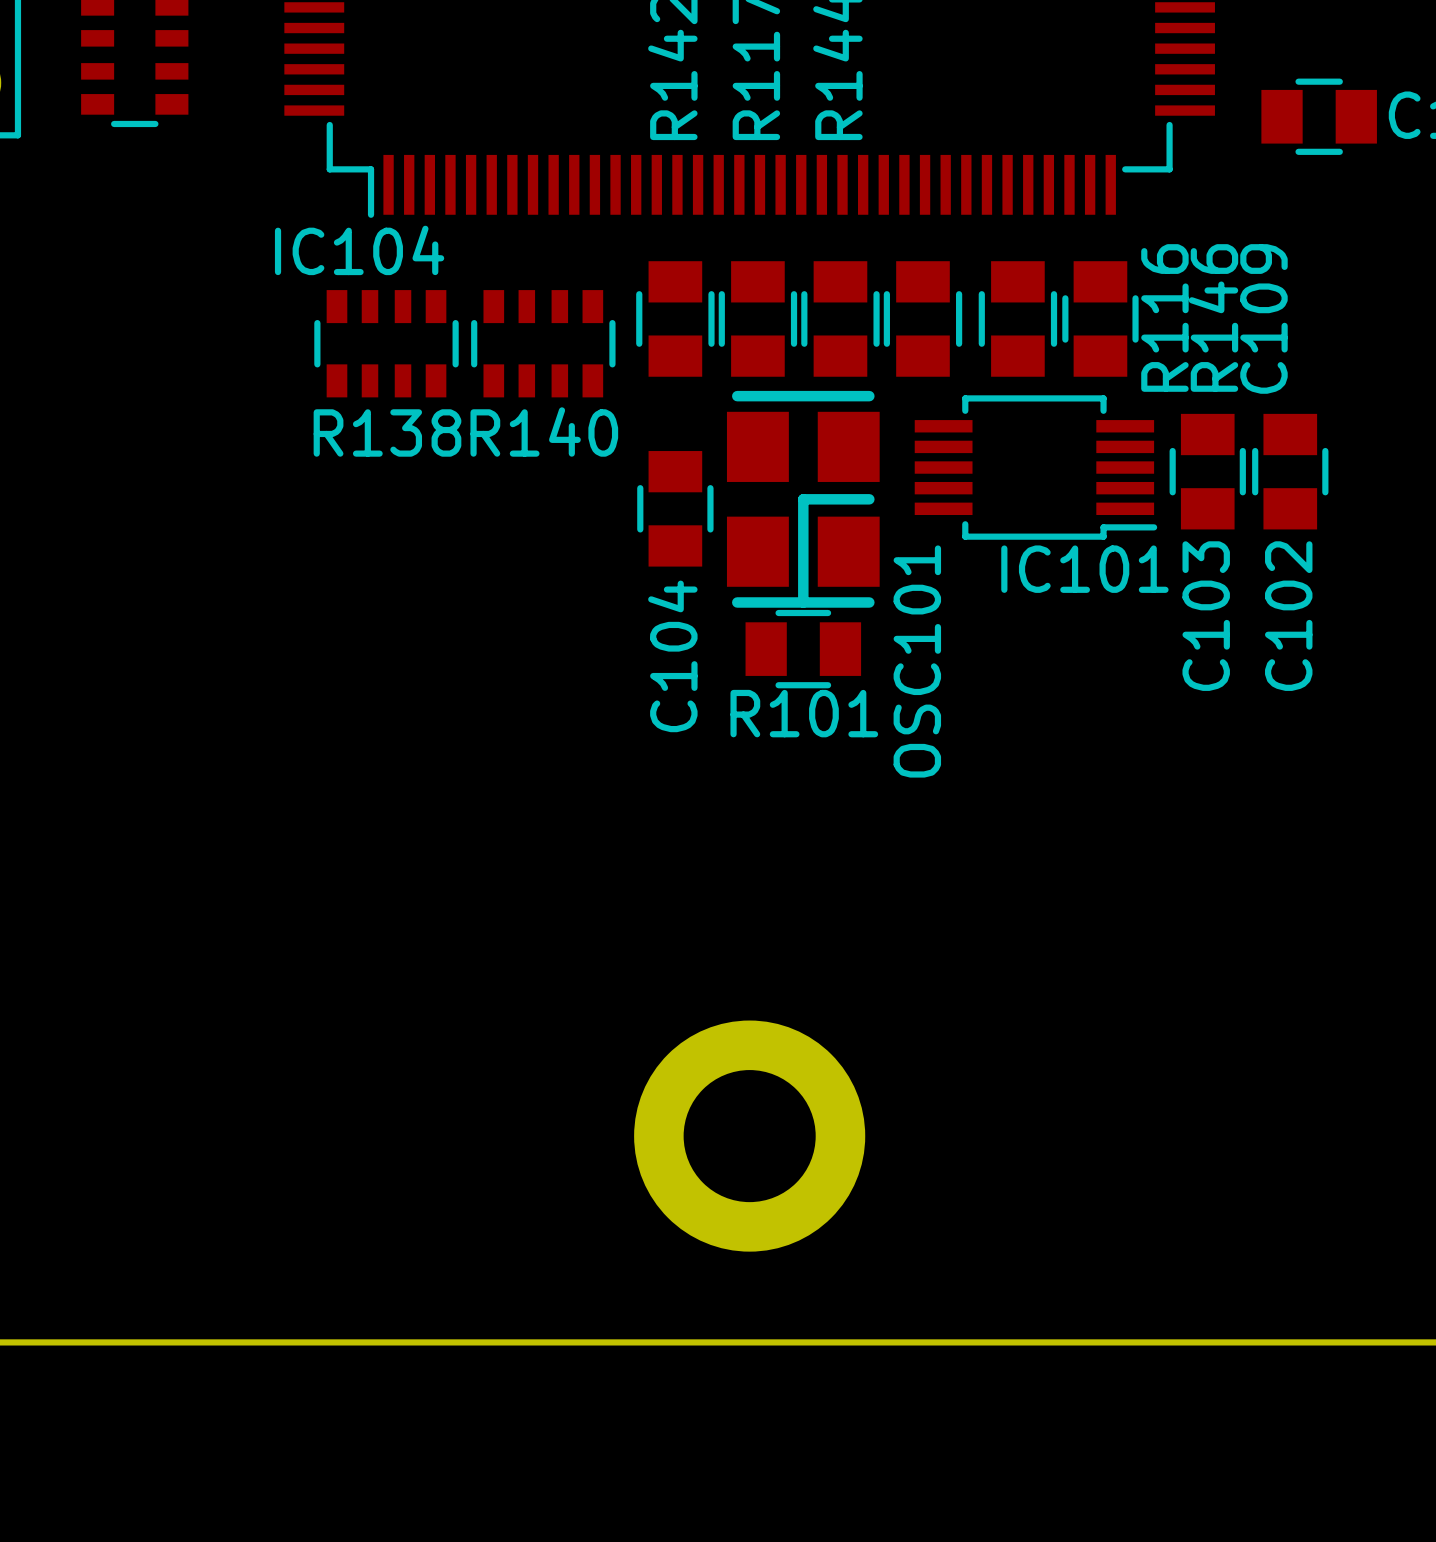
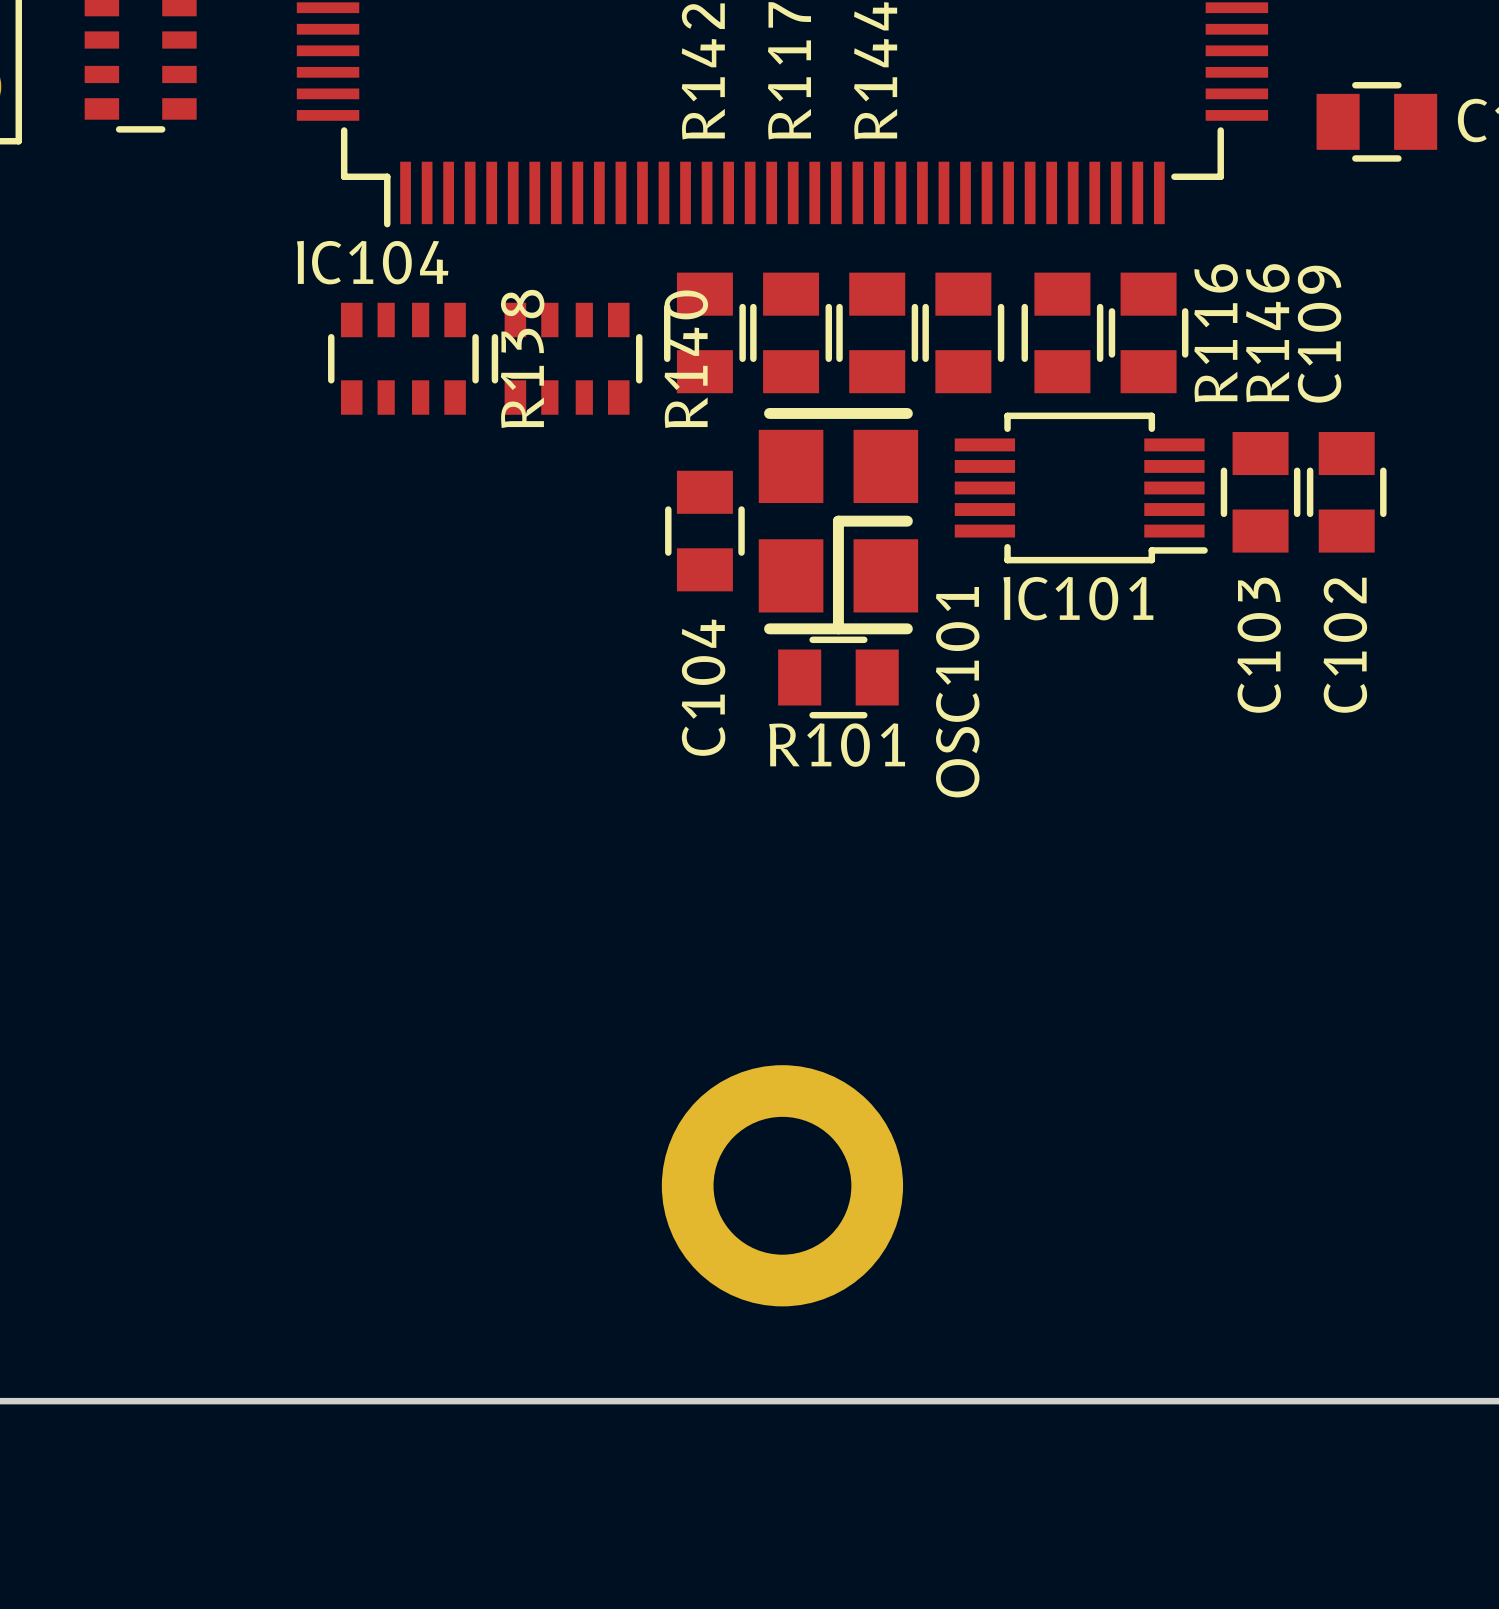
R140 name rotation: 0° (544, 431) -> 90° counterclockwise (686, 359)
R138 name rotation: 0° (387, 432) -> 90° counterclockwise (522, 358)
IC101 name position: IC101 (1084, 569) -> IC101 (1078, 598)

